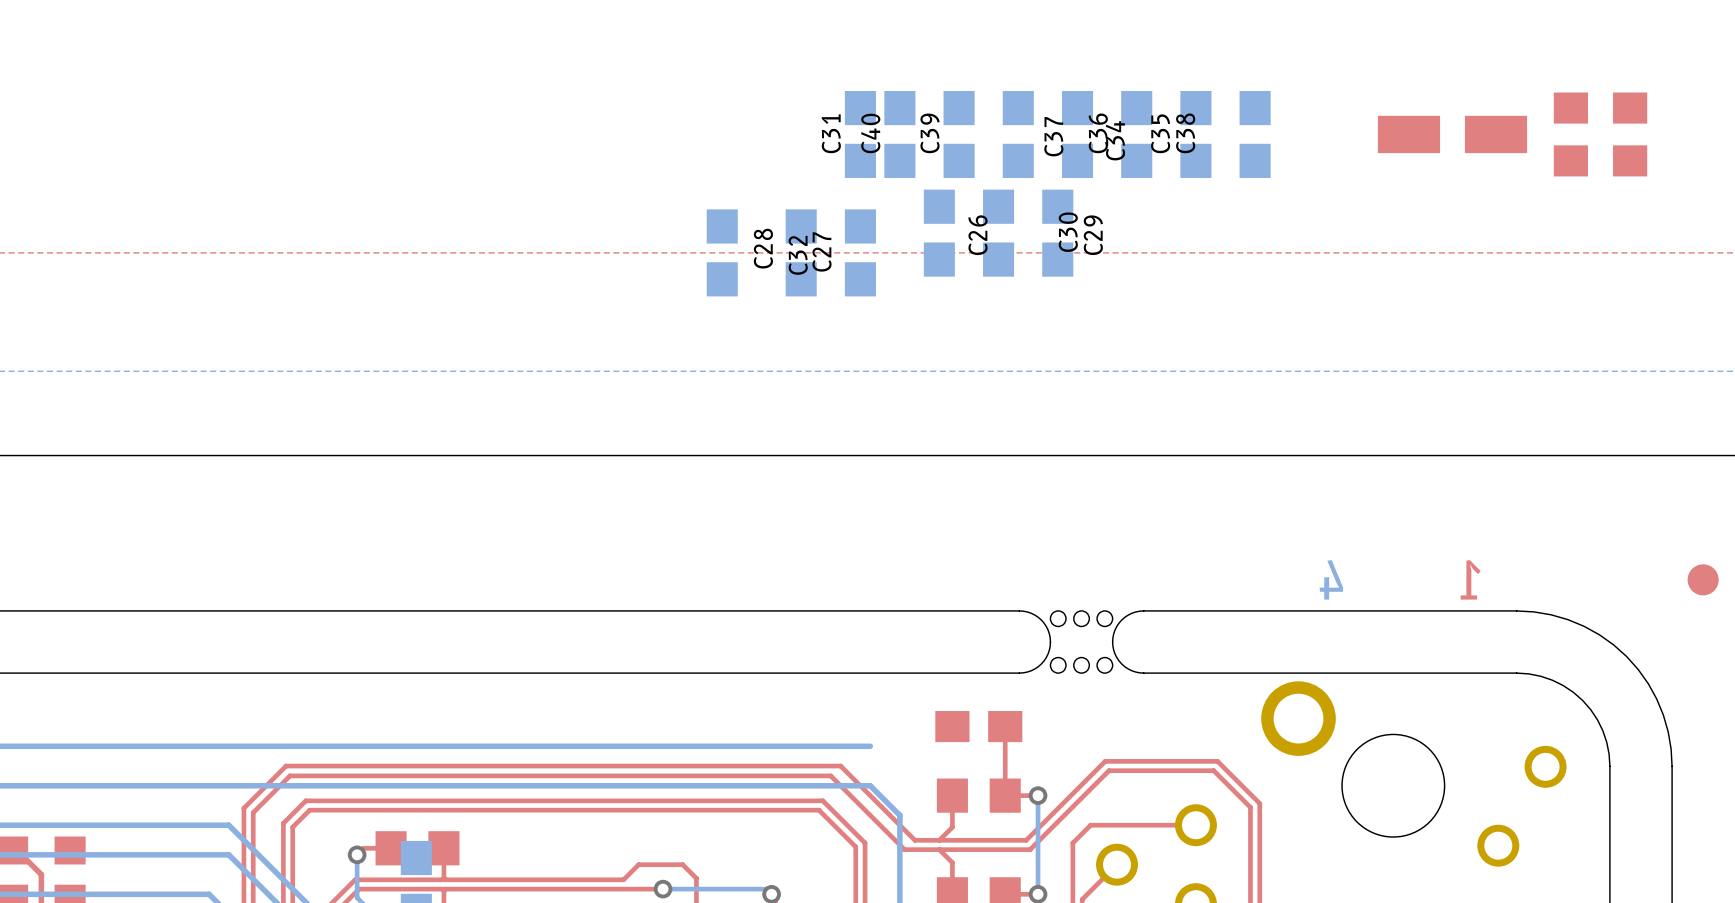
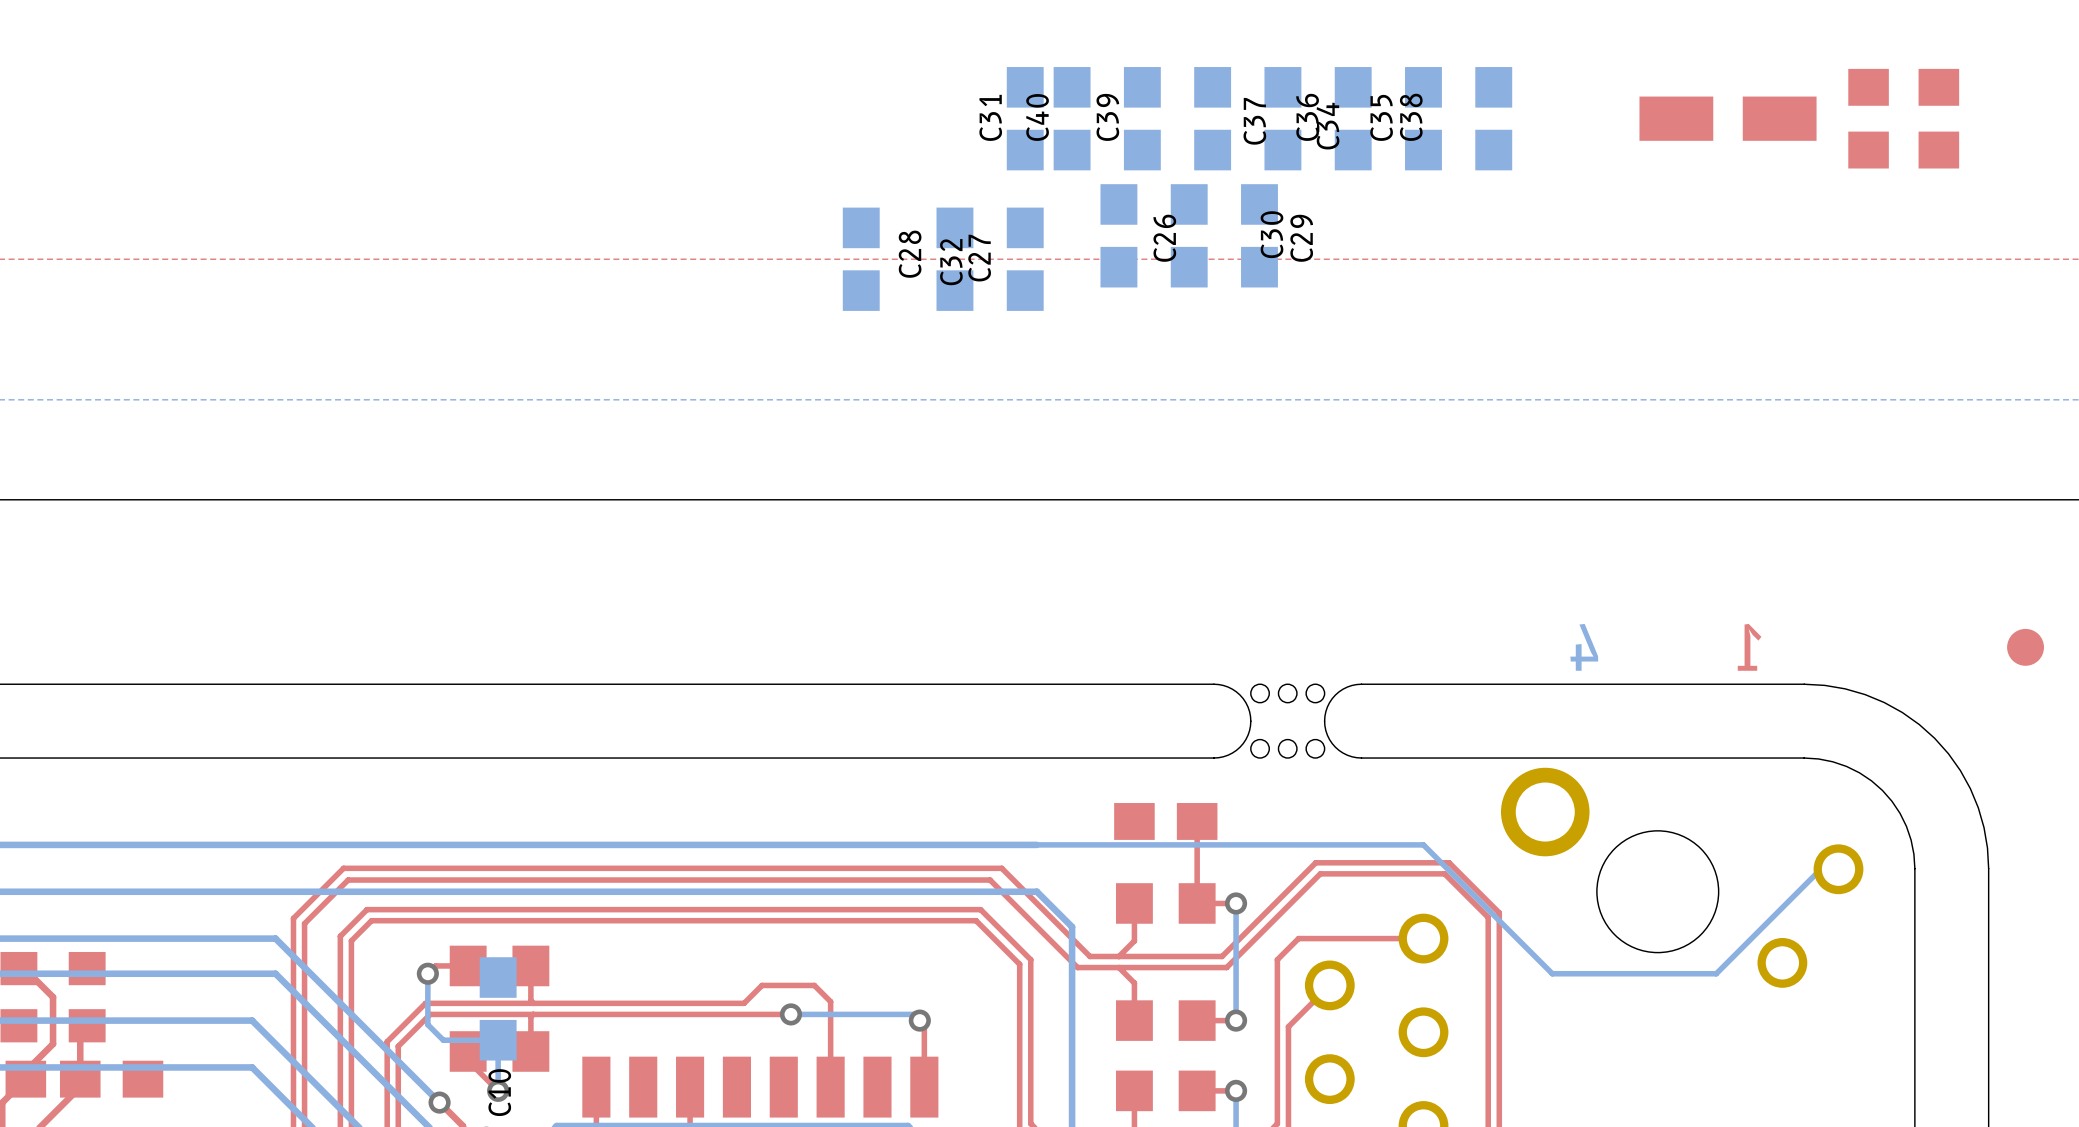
bottom track: none -> (1036, 844) (1423, 844) (1552, 973) (1716, 973) (1820, 869) (1838, 869)

